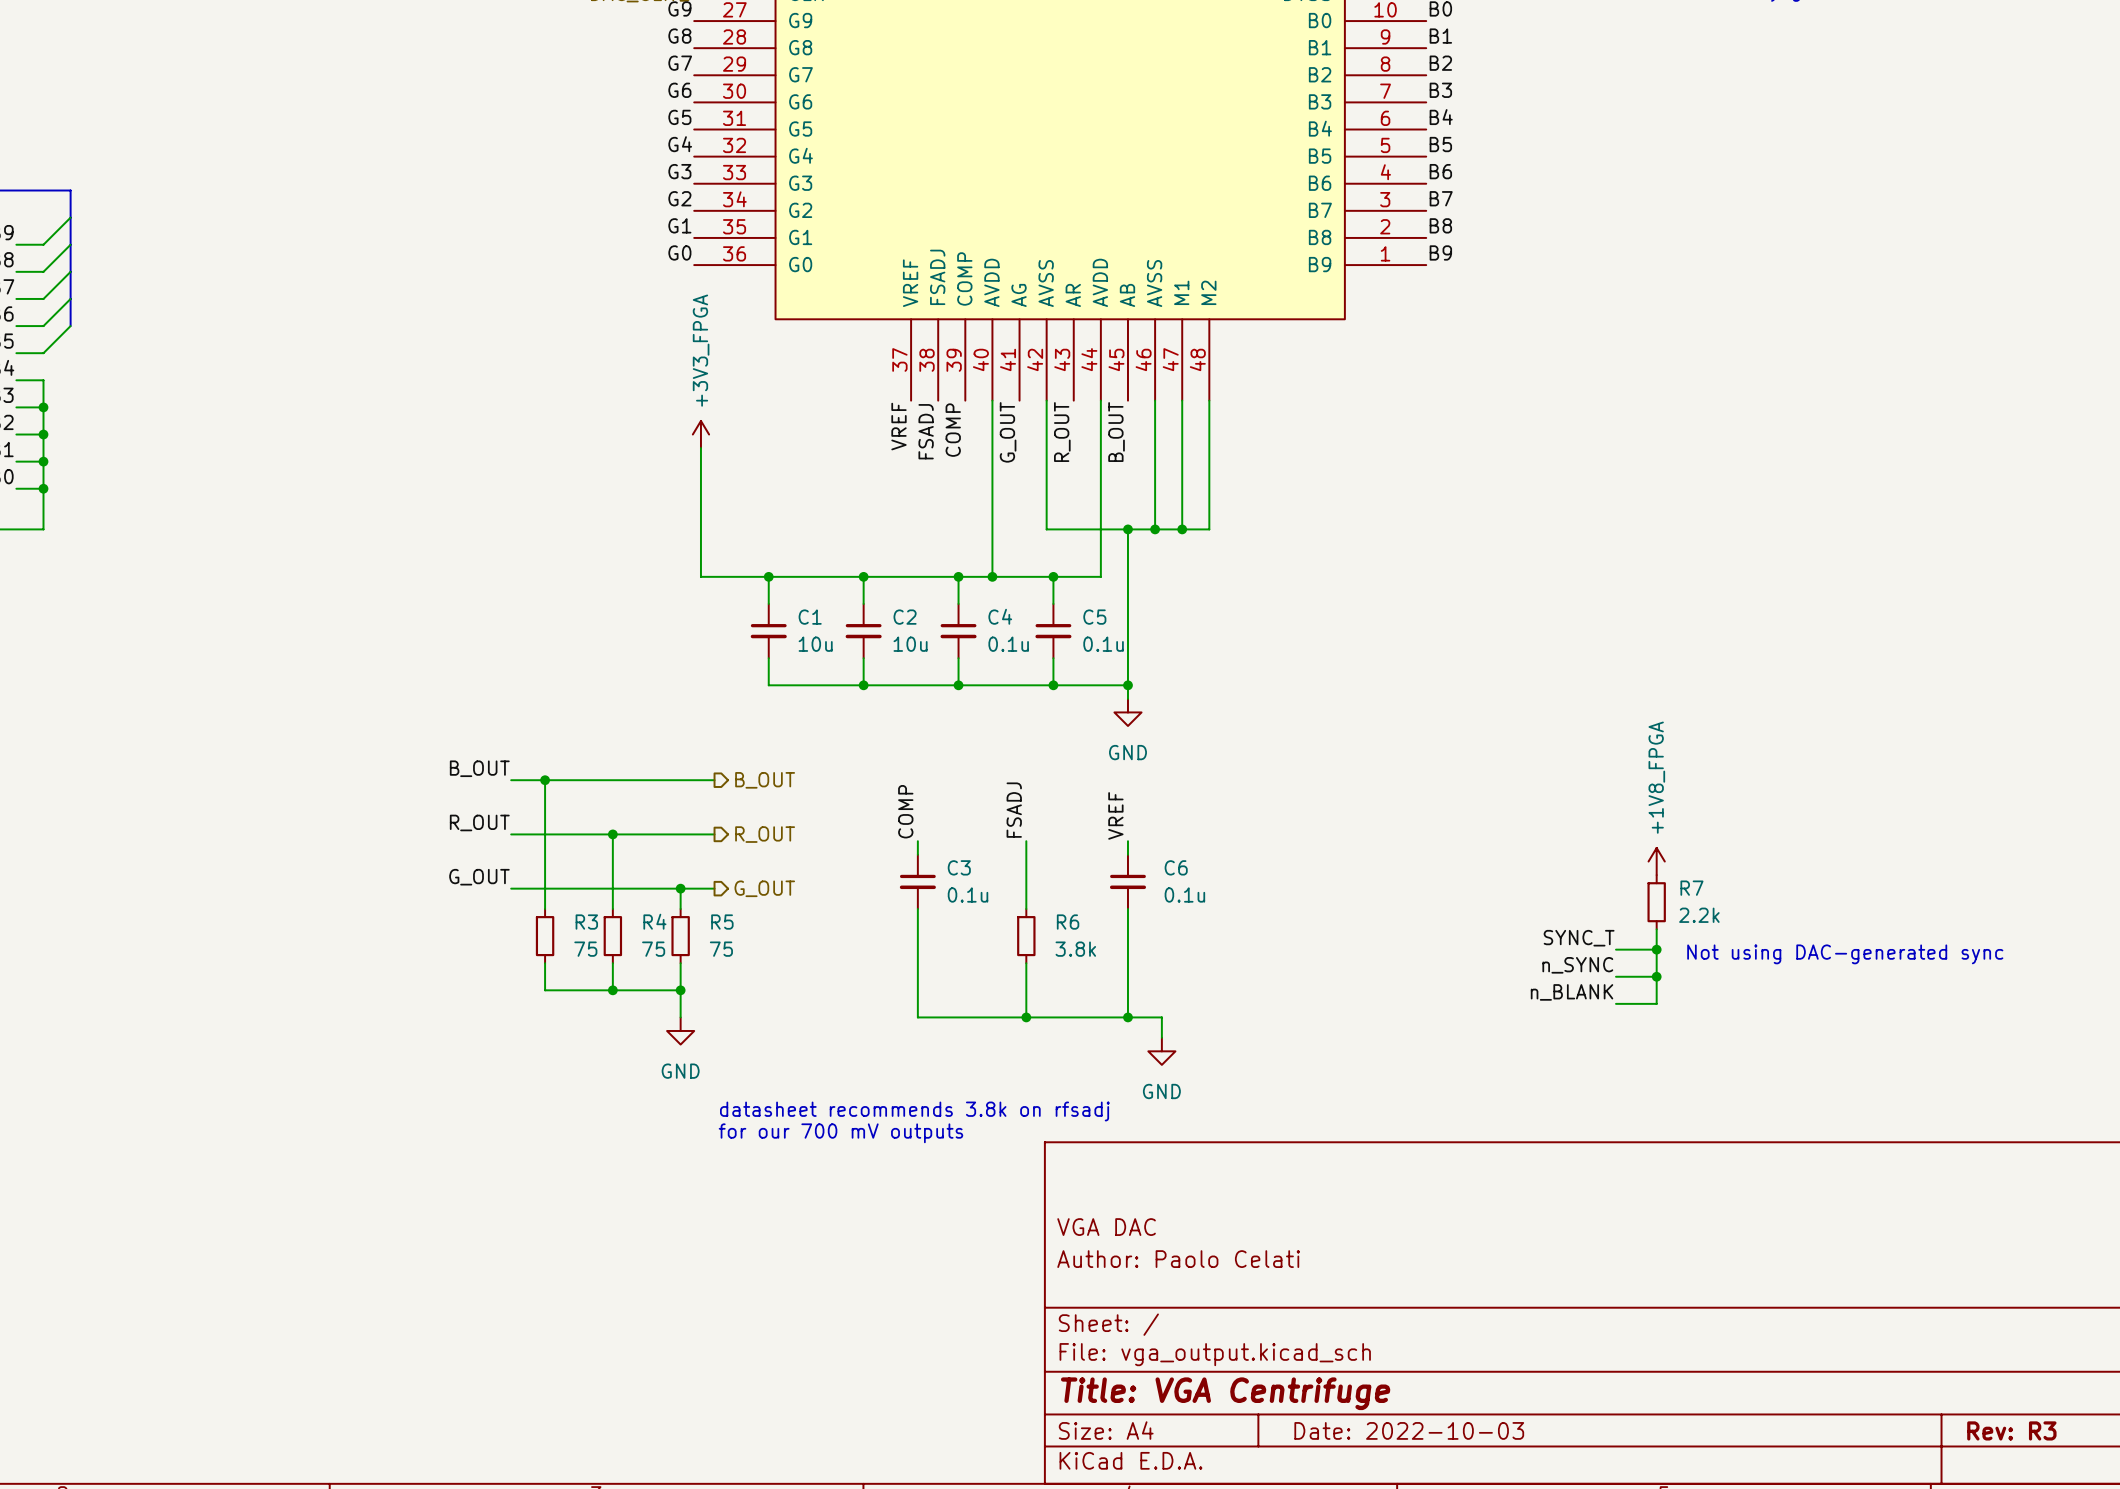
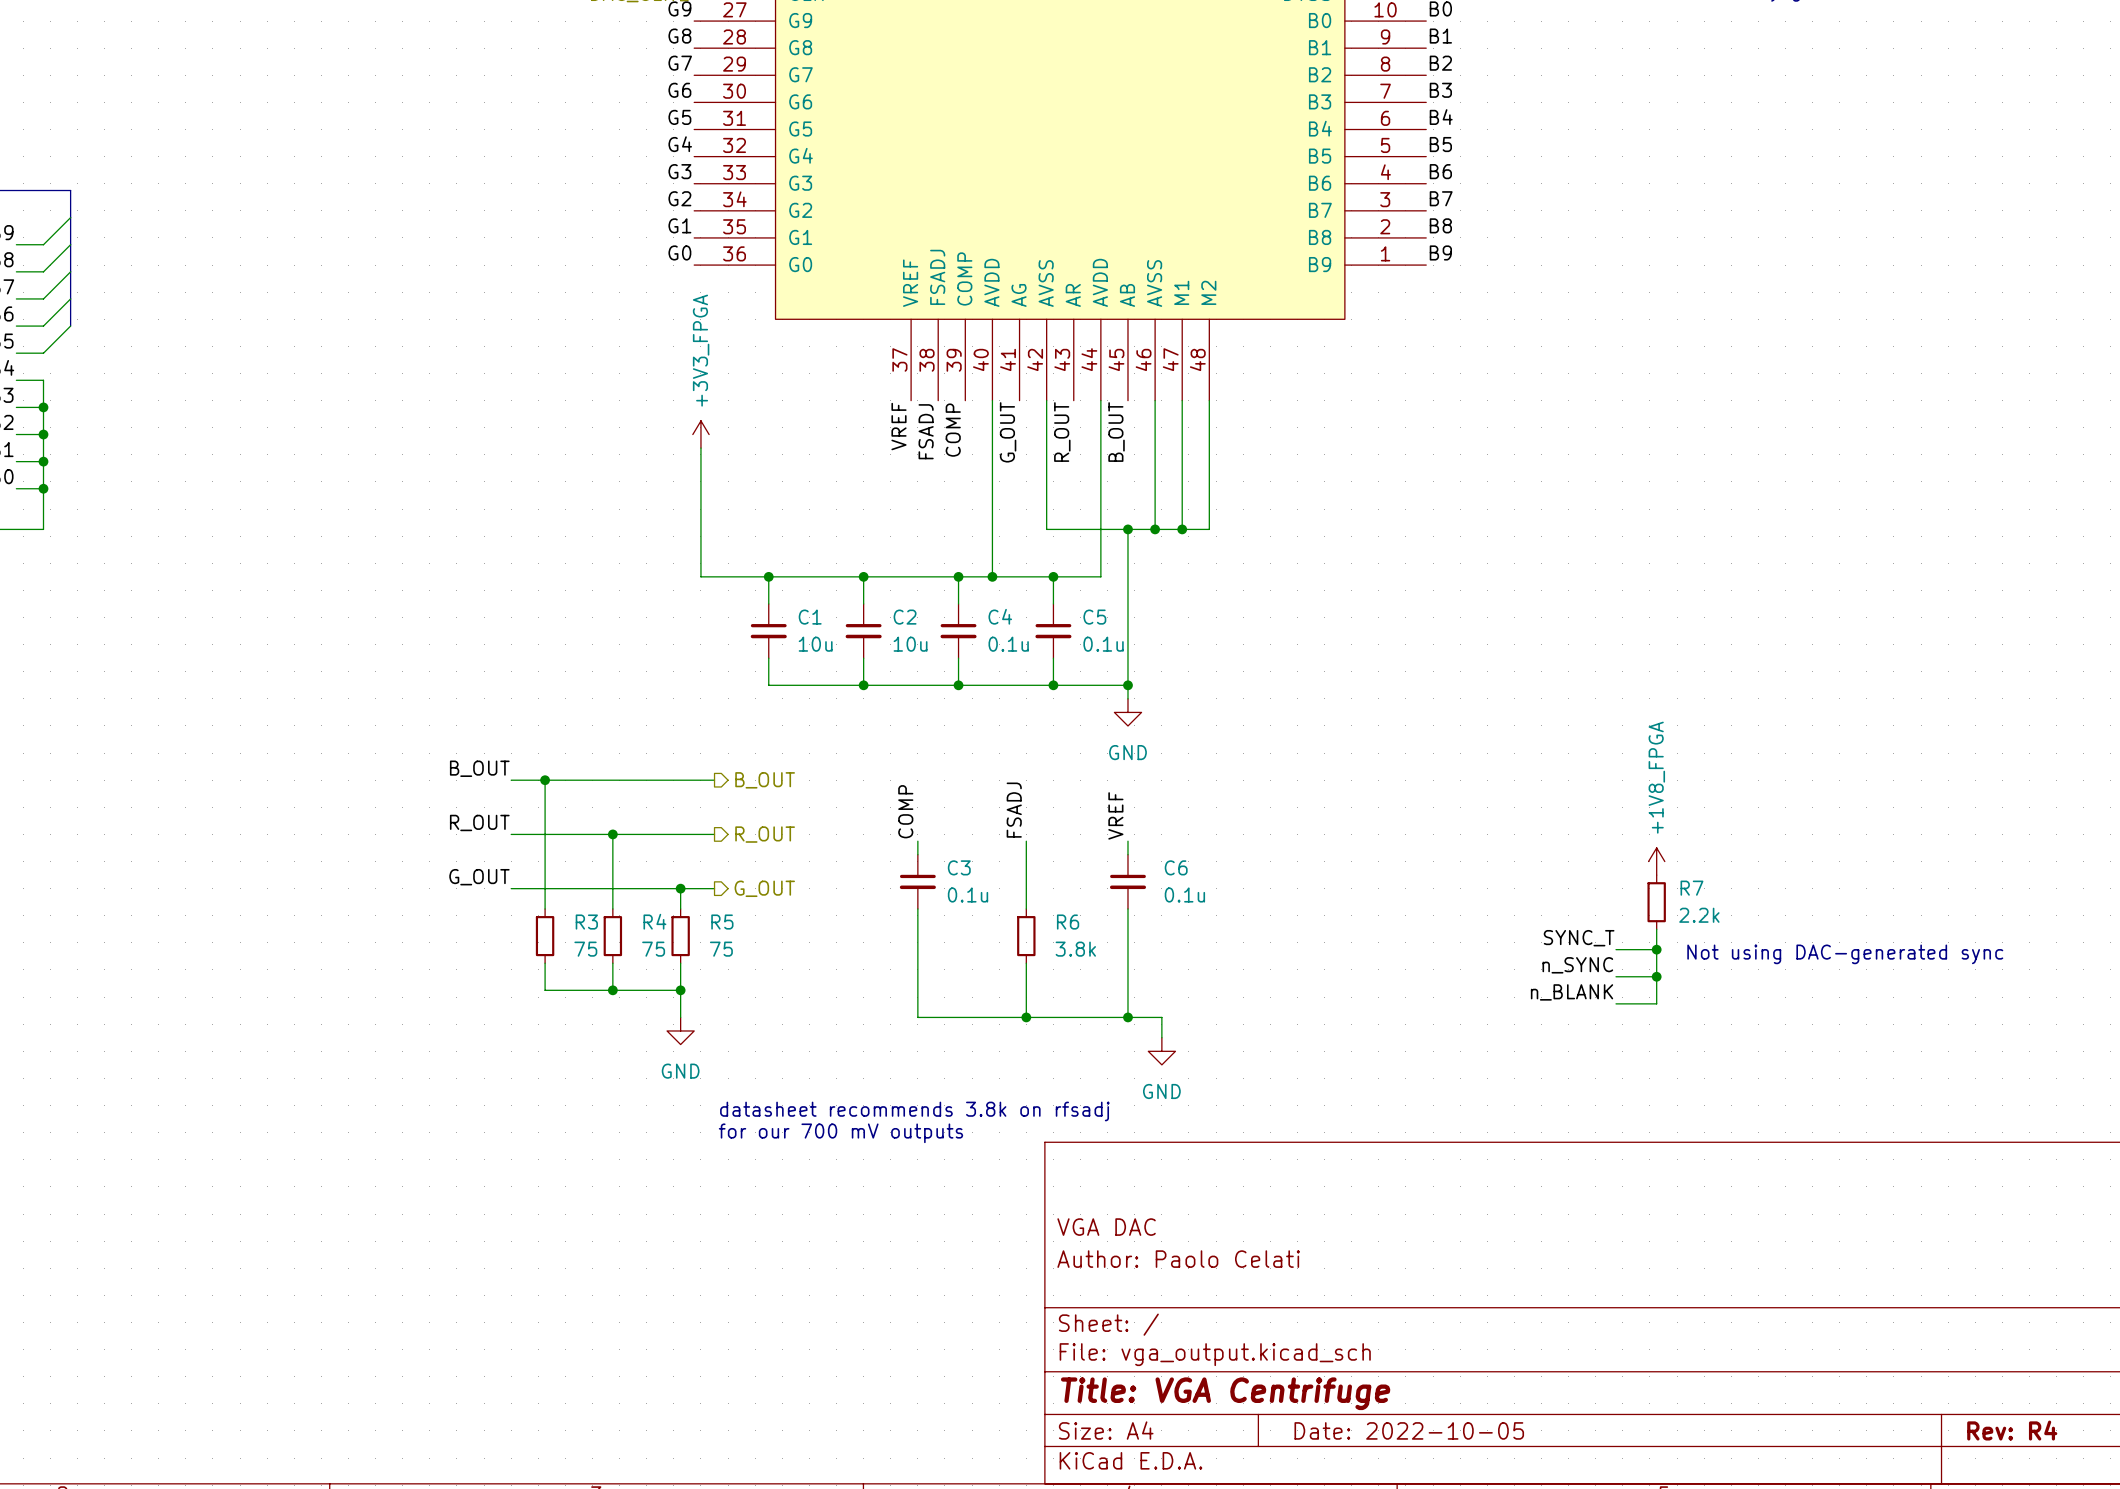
title block: Date: 2022-10-03 (1409, 1430) -> Date: 2022-10-05 (1409, 1430)
title block: Rev: R3 (2011, 1430) -> Rev: R4 (2012, 1430)

